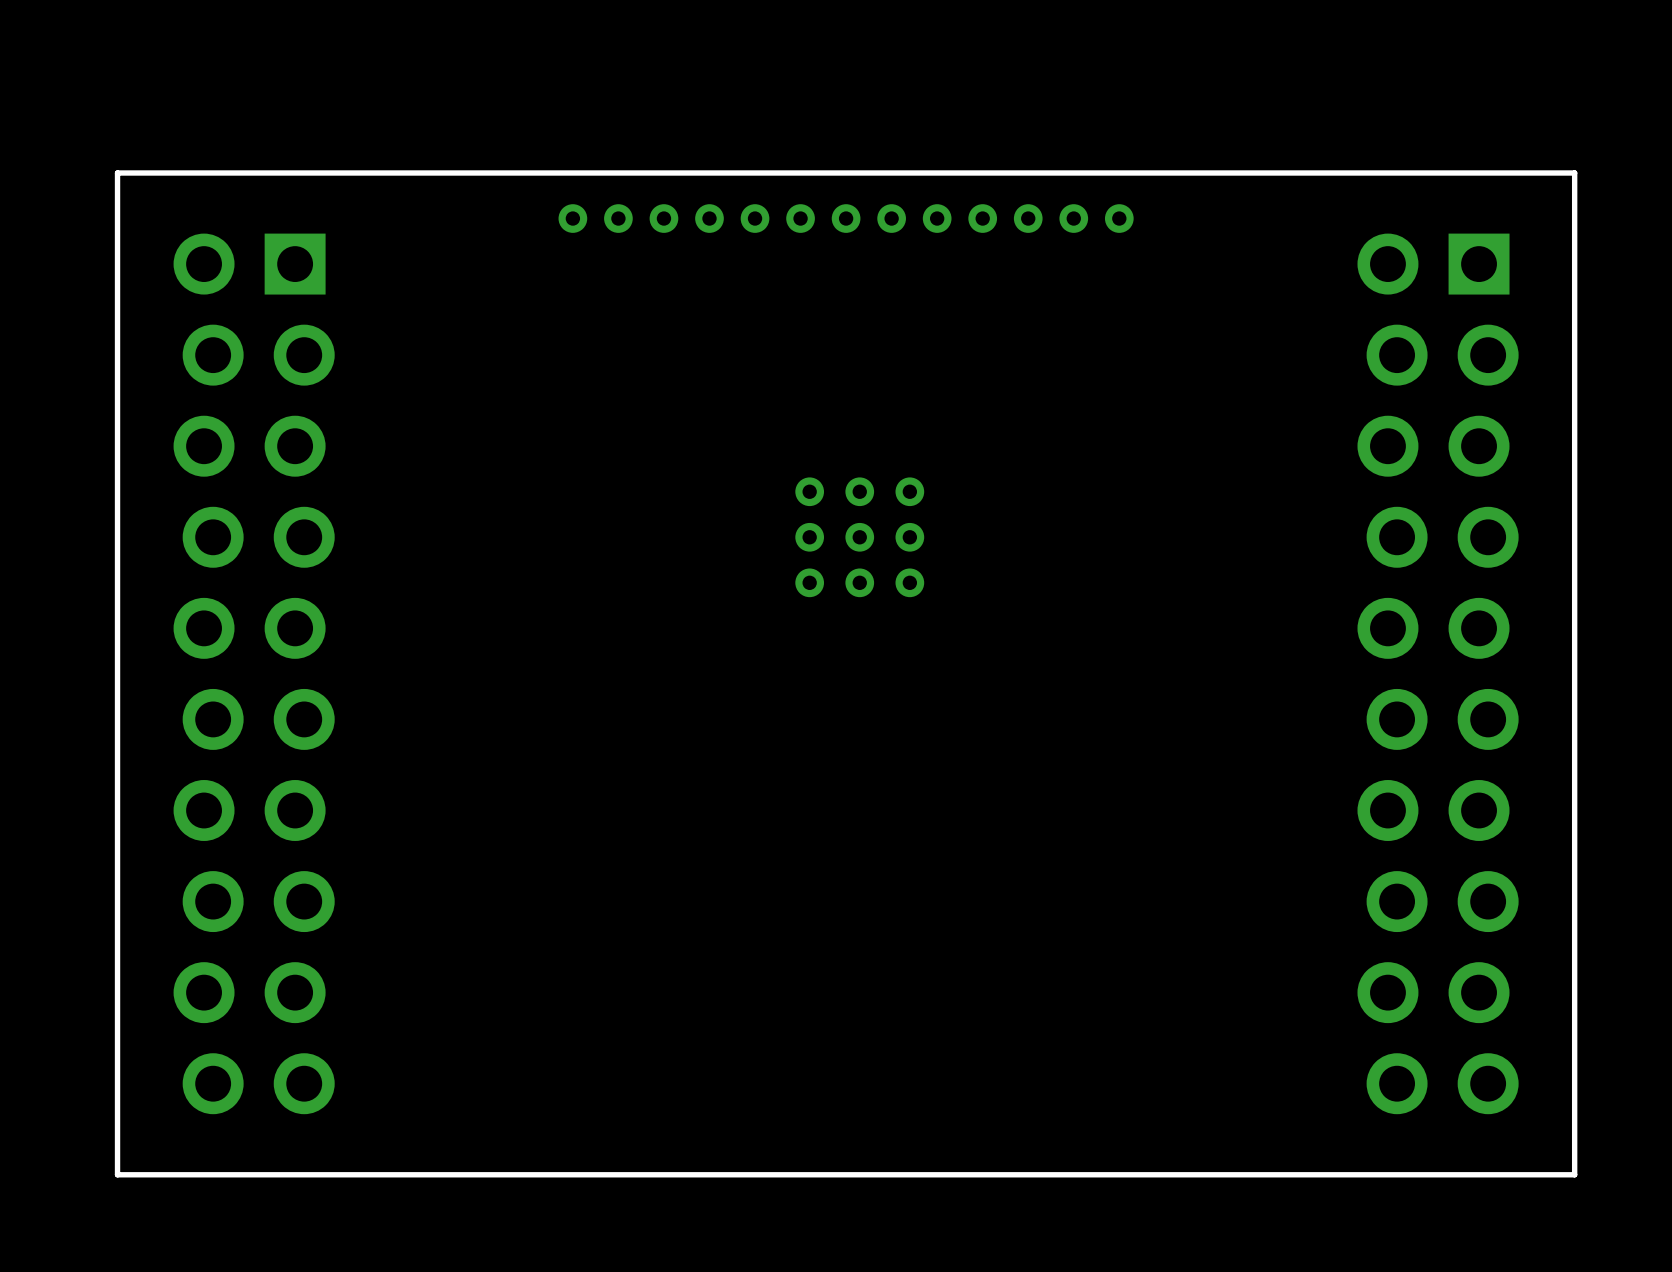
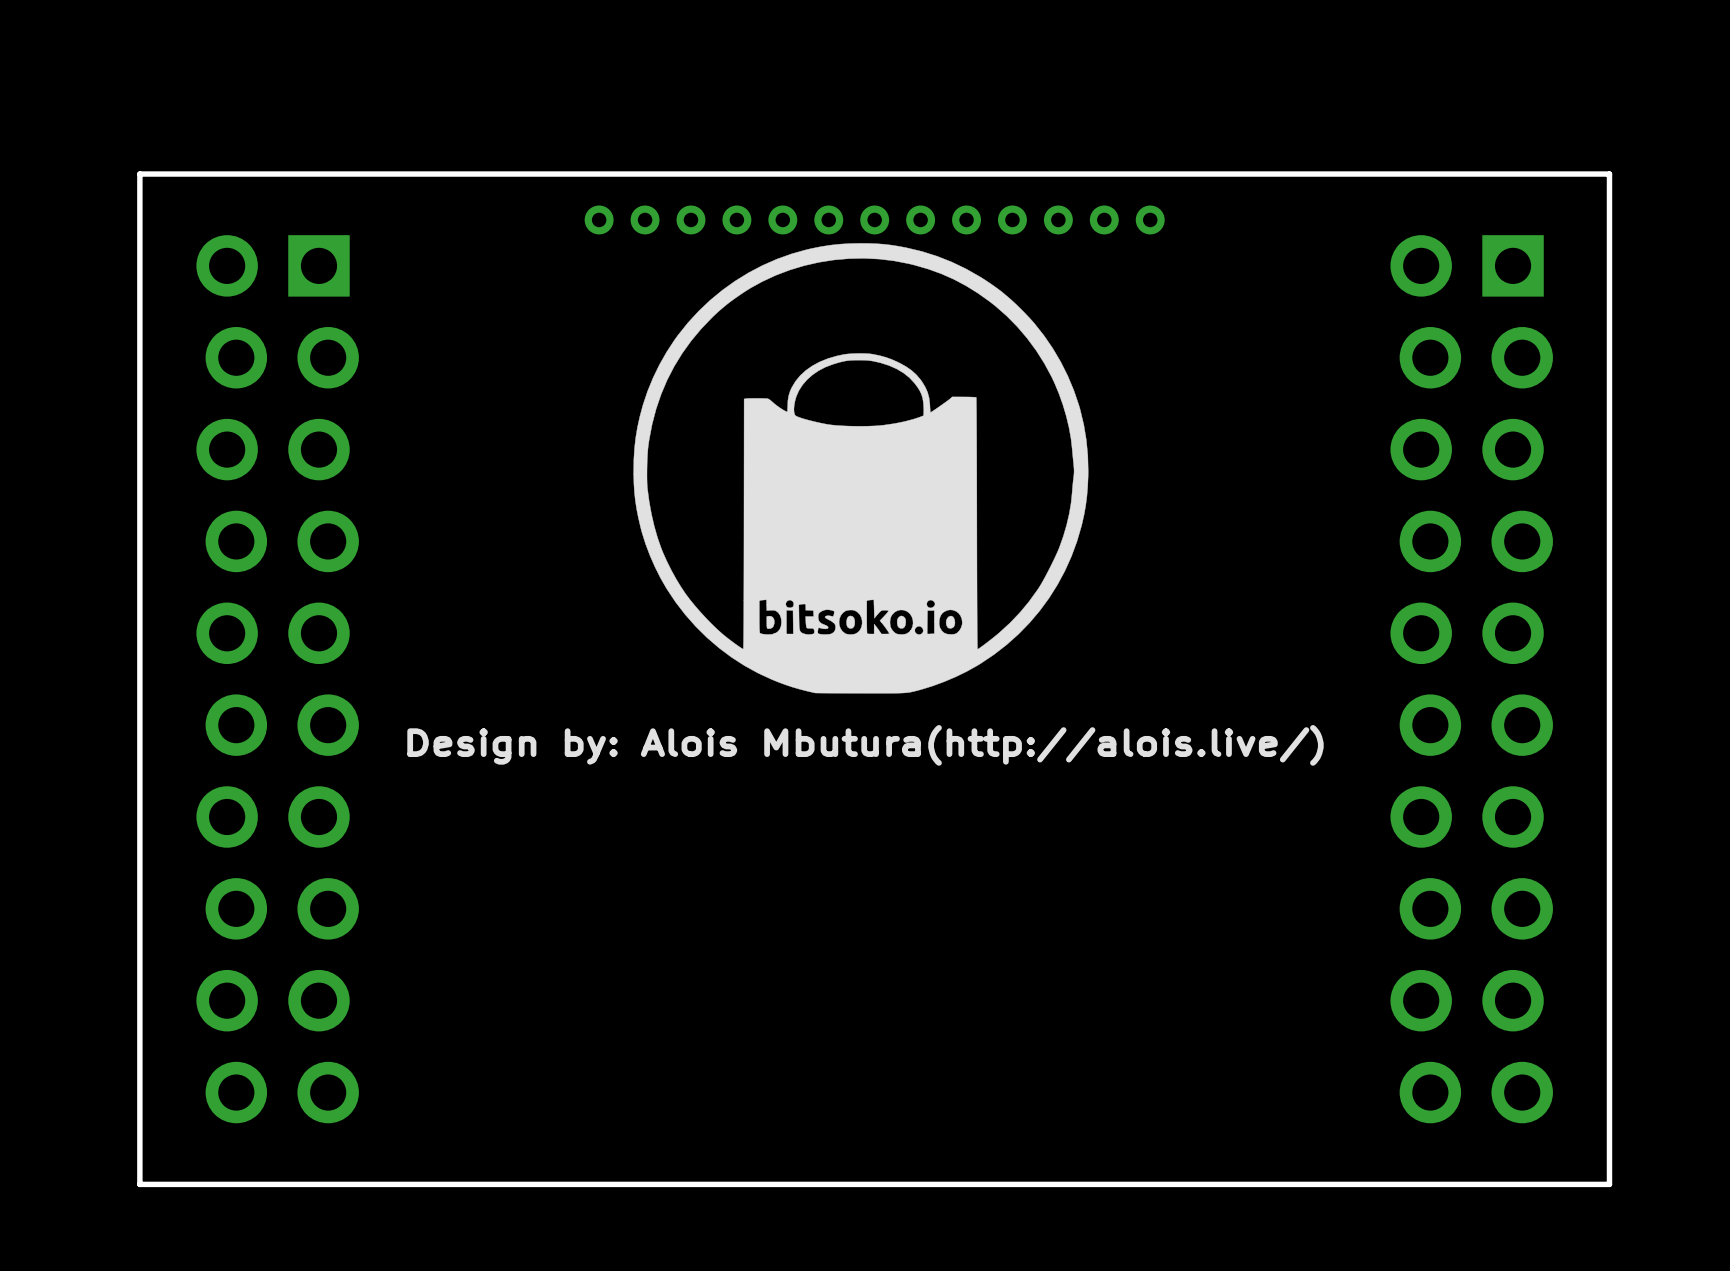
drawing: none -> [633, 243, 1089, 694]
text: none -> Design by: Alois Mbutura(http://alois.live/) (865, 745)

